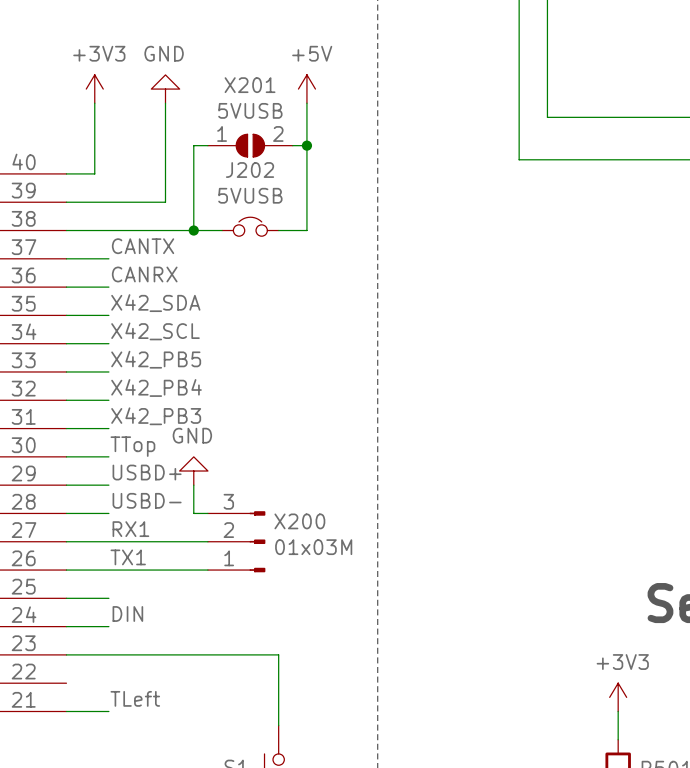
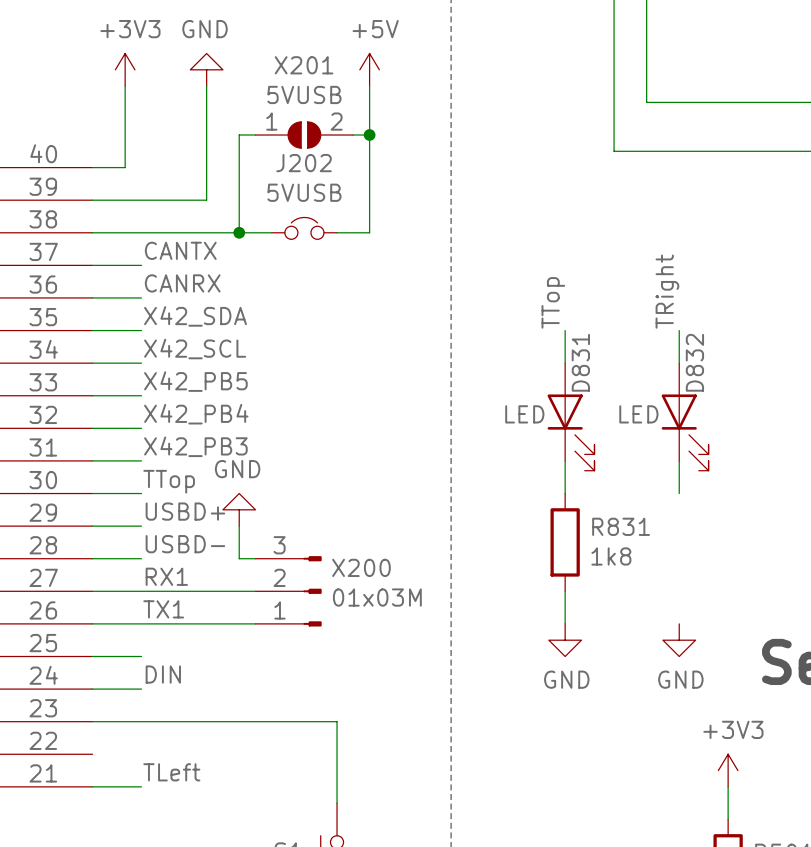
label: none -> TRight (667, 291)
label: none -> TTop (553, 302)
wire: none -> (565, 330) (565, 363)
wire: none -> (679, 330) (679, 363)
D831: none -> LED (571, 416)
D832: none -> LED (685, 416)
wire: none -> (565, 460) (565, 493)
wire: none -> (679, 460) (679, 493)
R831: none -> 1k8 (565, 542)
wire: none -> (565, 591) (565, 623)
power symbol: none -> GND (565, 640)
power symbol: none -> GND (679, 640)

